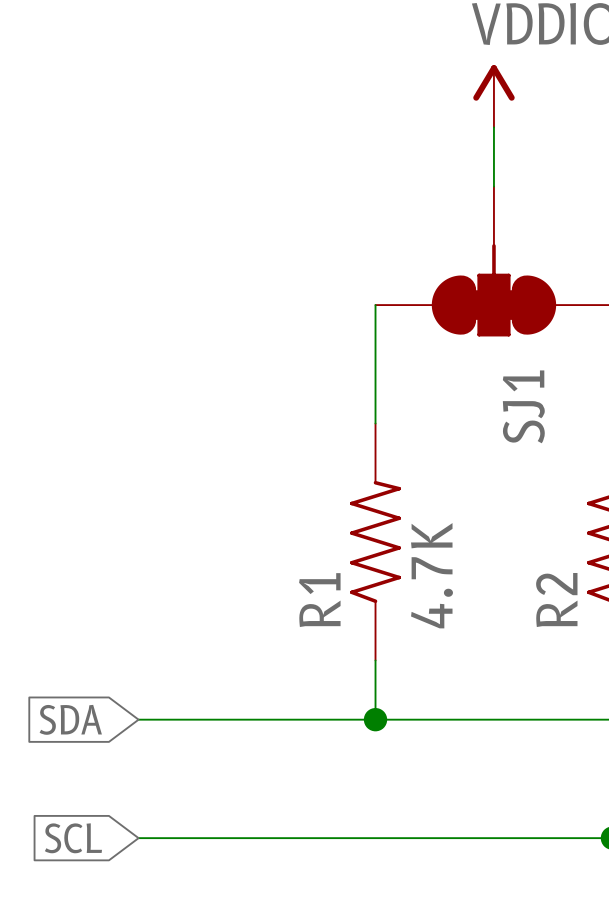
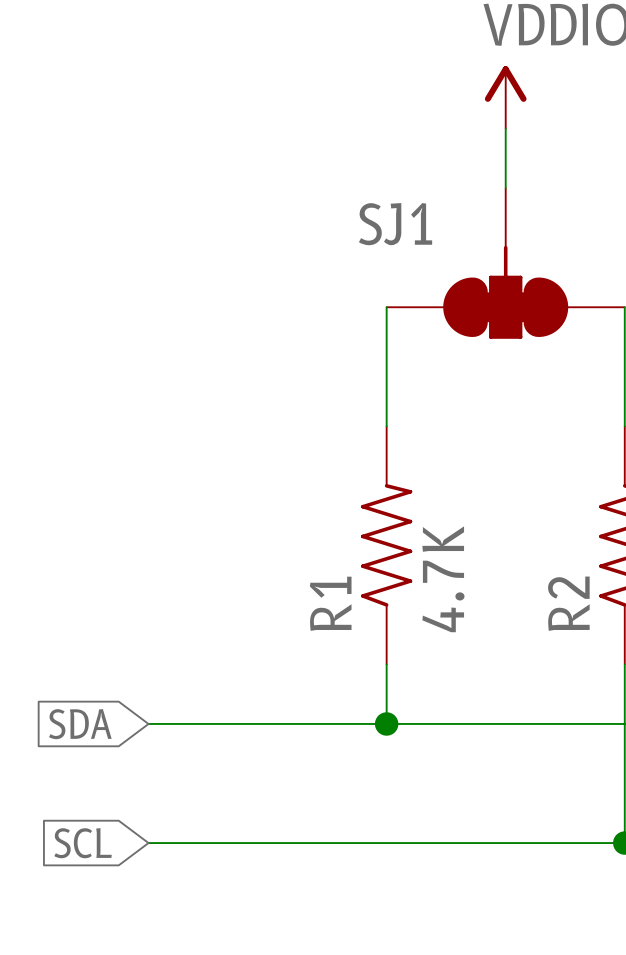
SJ1 name rotation: 0° (523, 406) -> 90° clockwise (395, 224)
SJ1 name position: SJ1 (523, 406) -> SJ1 (395, 224)

